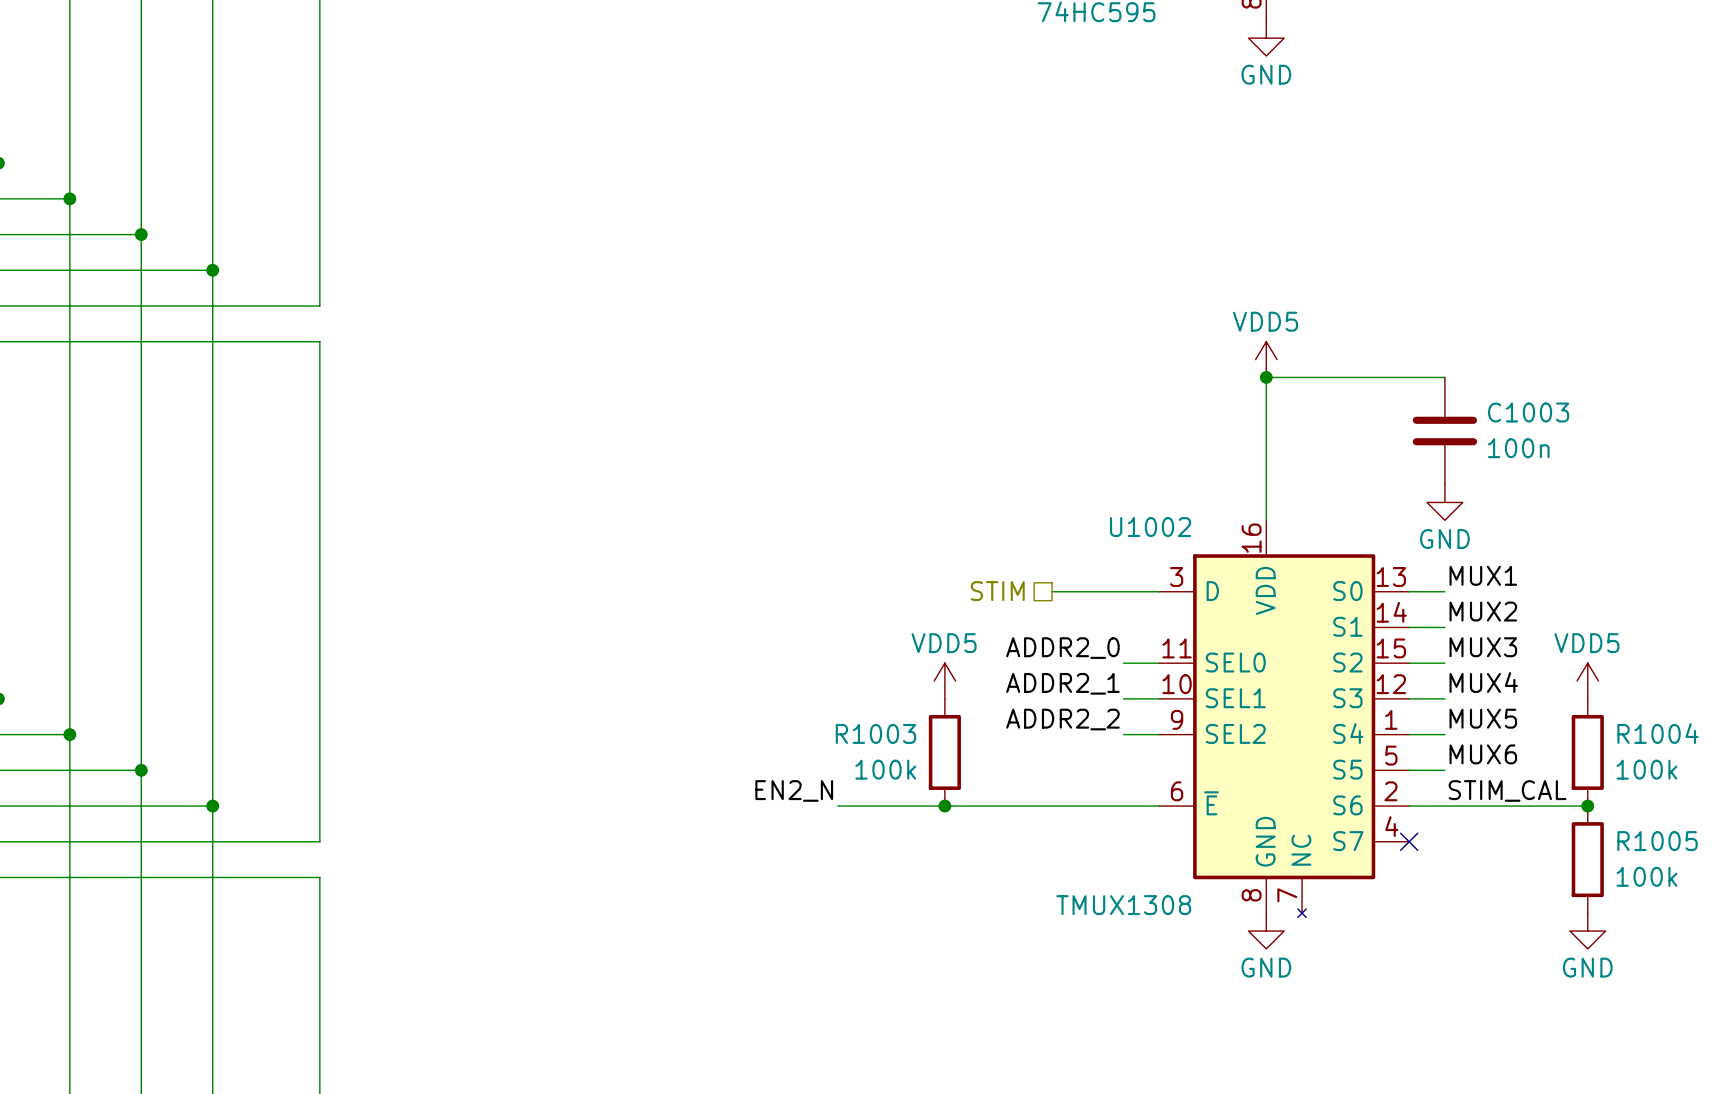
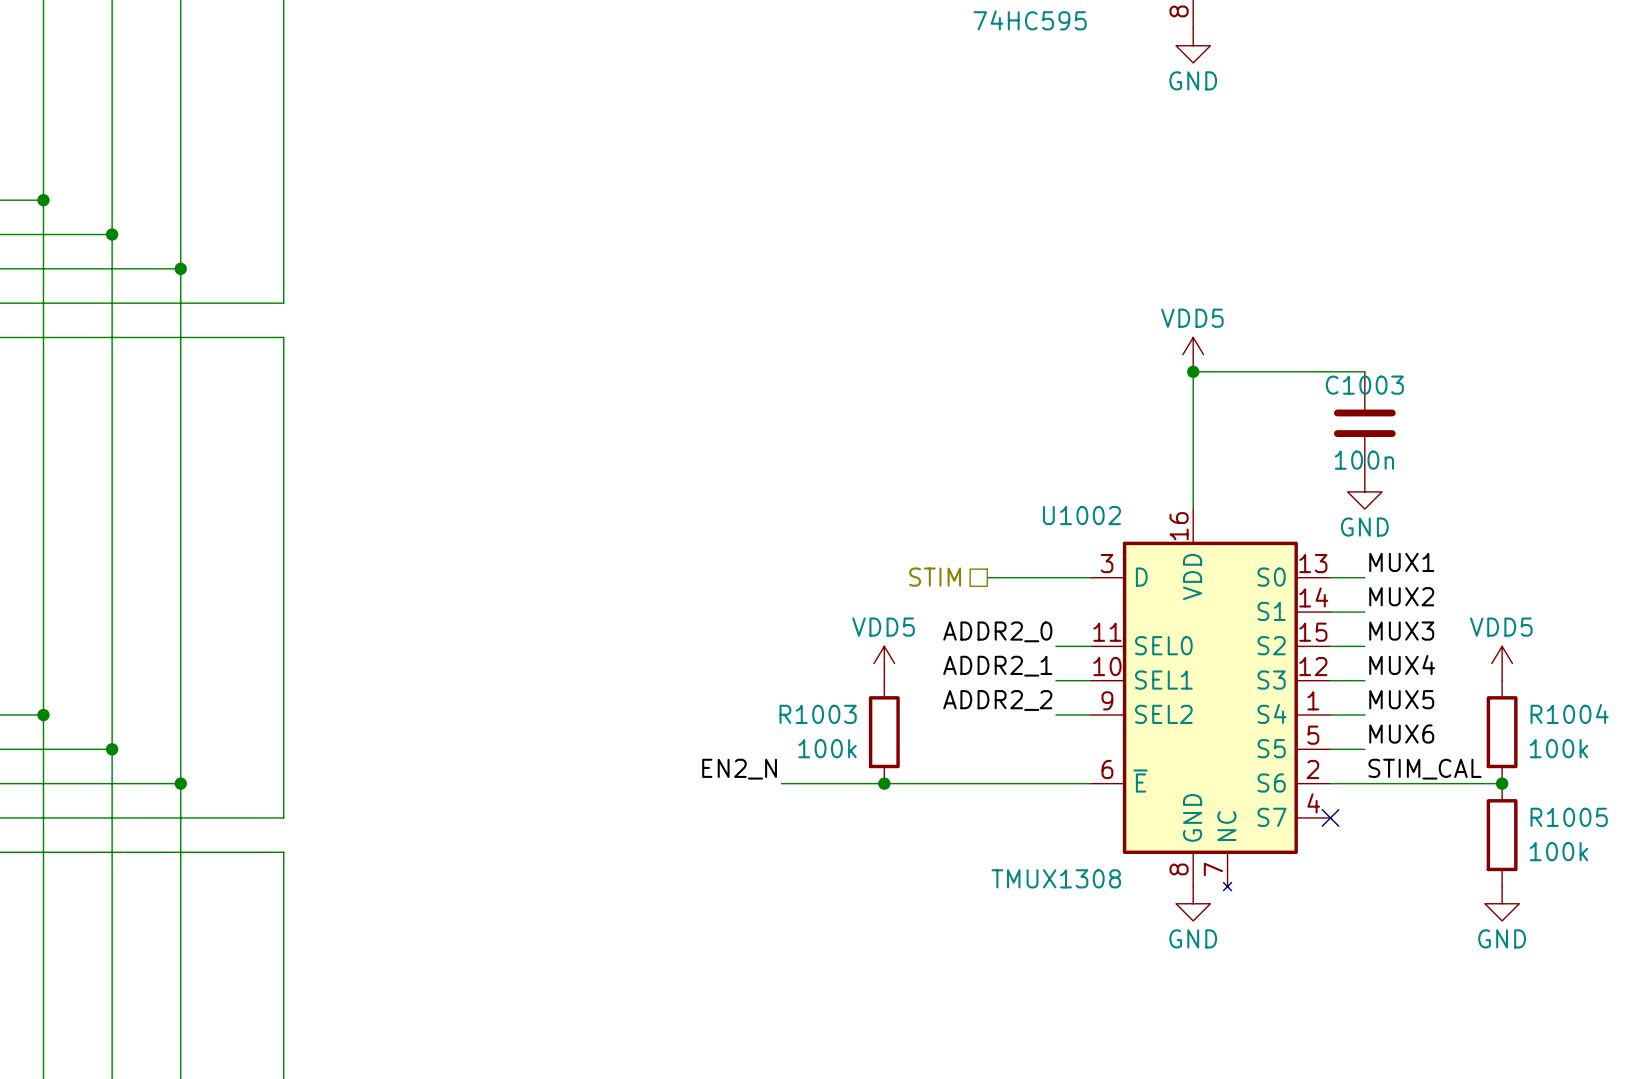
C1003 name position: C1003 (1528, 412) -> C1003 (1364, 385)
C1003 value position: 100n (1518, 448) -> 100n (1364, 460)

